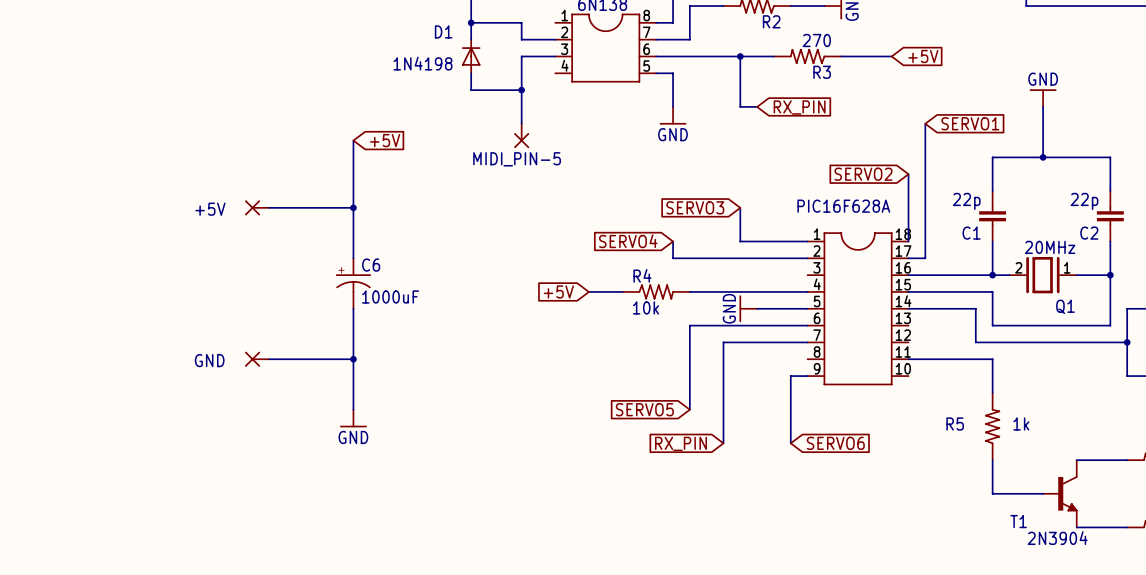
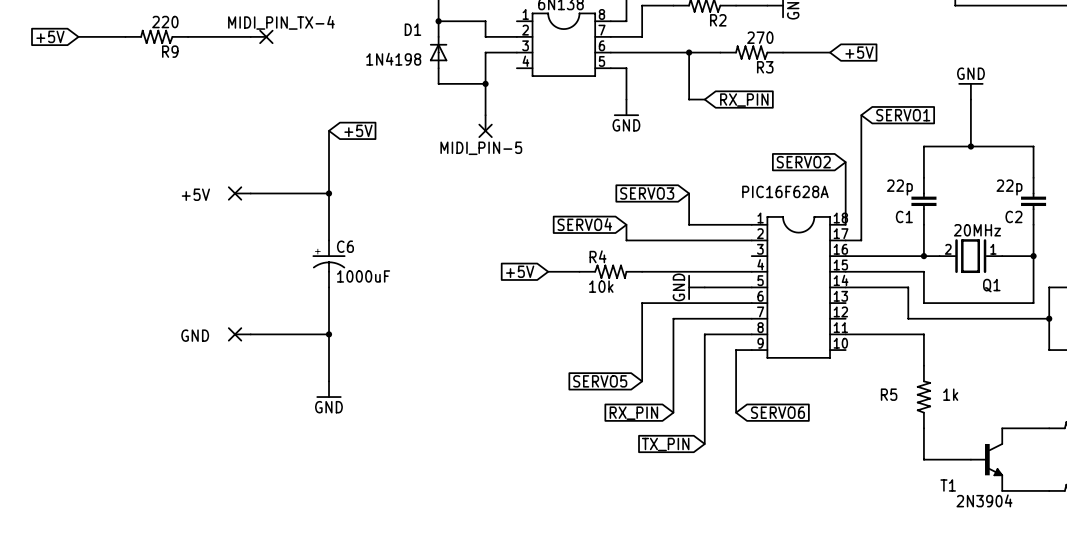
global label: none -> +5V (50, 36)
wire: none -> (78, 36) (125, 36)
R9: none -> 220 (156, 36)
wire: none -> (188, 36) (250, 36)
MIDI_PIN_TX-4: none -> (262, 36)
wire: none -> (751, 334) (704, 334) (704, 443)
global label: none -> TX_PIN (665, 444)

